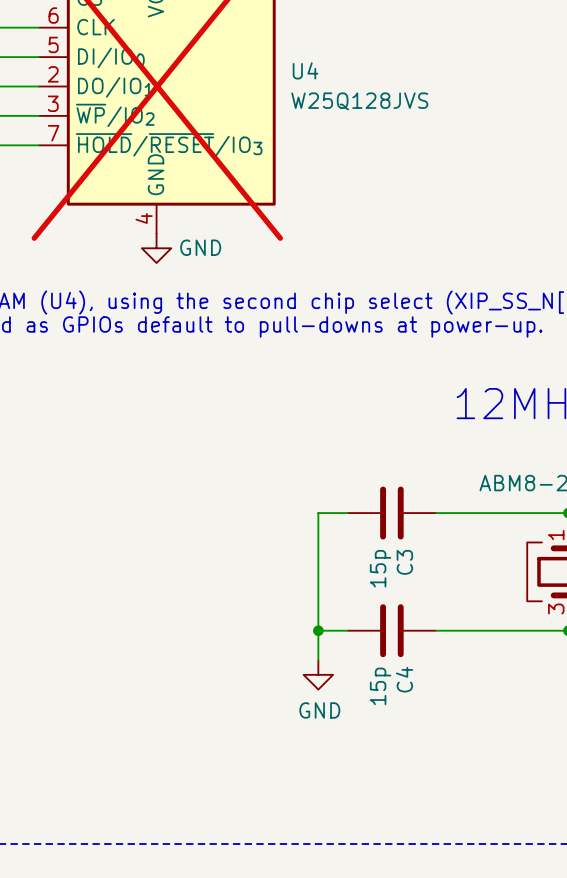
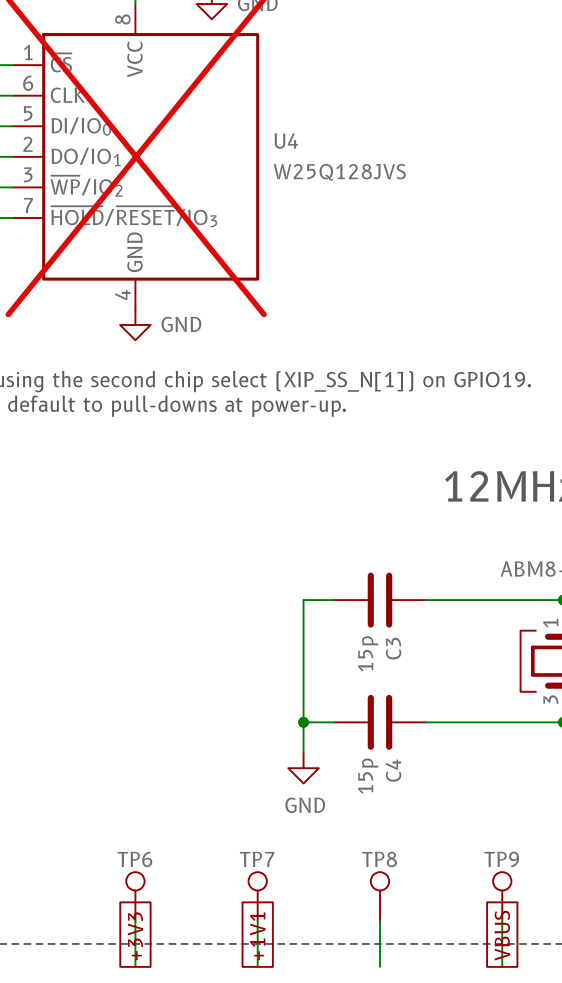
TP6: none -> (135, 896)
TP7: none -> (257, 896)
TP8: none -> (379, 896)
TP9: none -> (502, 896)
wire: none -> (135, 921) (135, 966)
wire: none -> (257, 921) (257, 966)
wire: none -> (379, 921) (379, 966)
wire: none -> (502, 921) (502, 966)
global label: none -> +3V3 (135, 936)
global label: none -> +1V1 (257, 936)
global label: none -> VBUS (502, 935)

